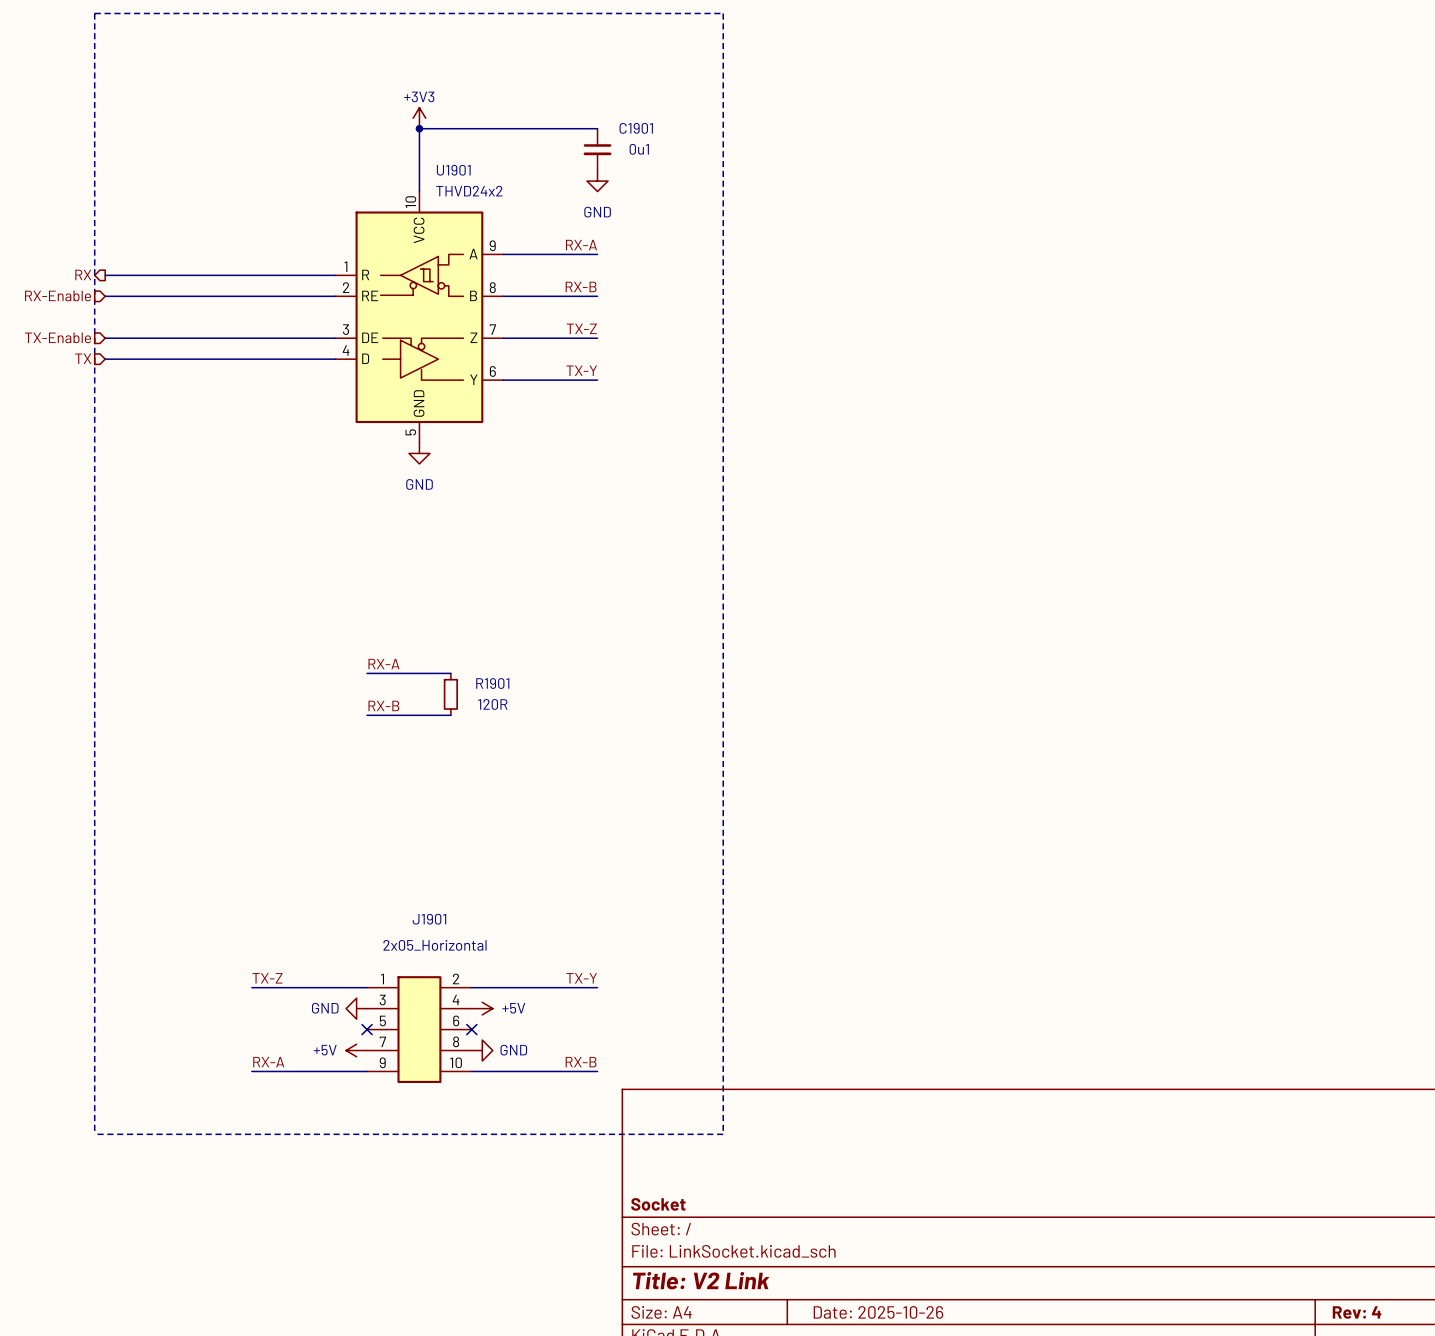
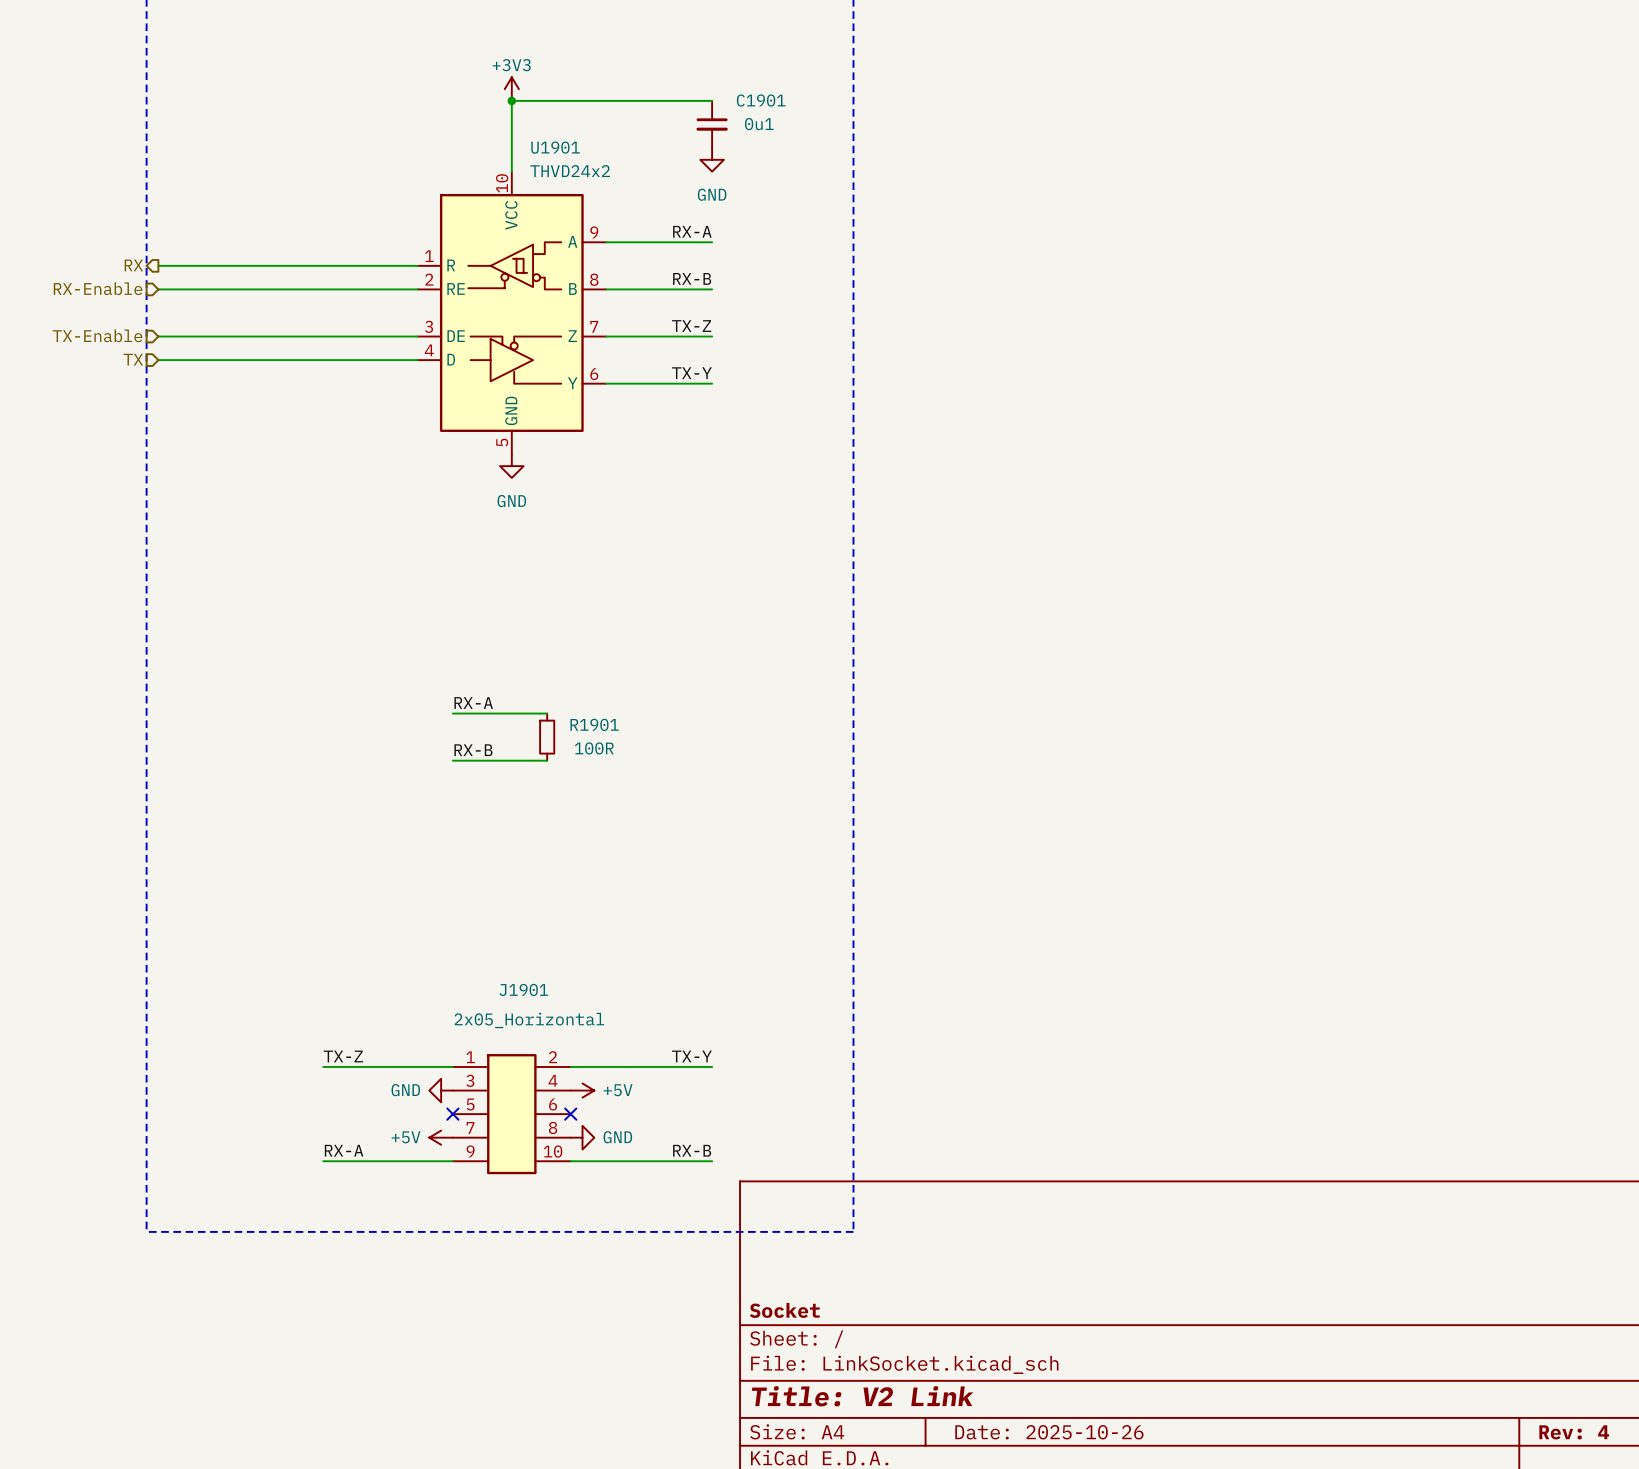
R1901 value: 120R (492, 704) -> 100R (594, 748)

